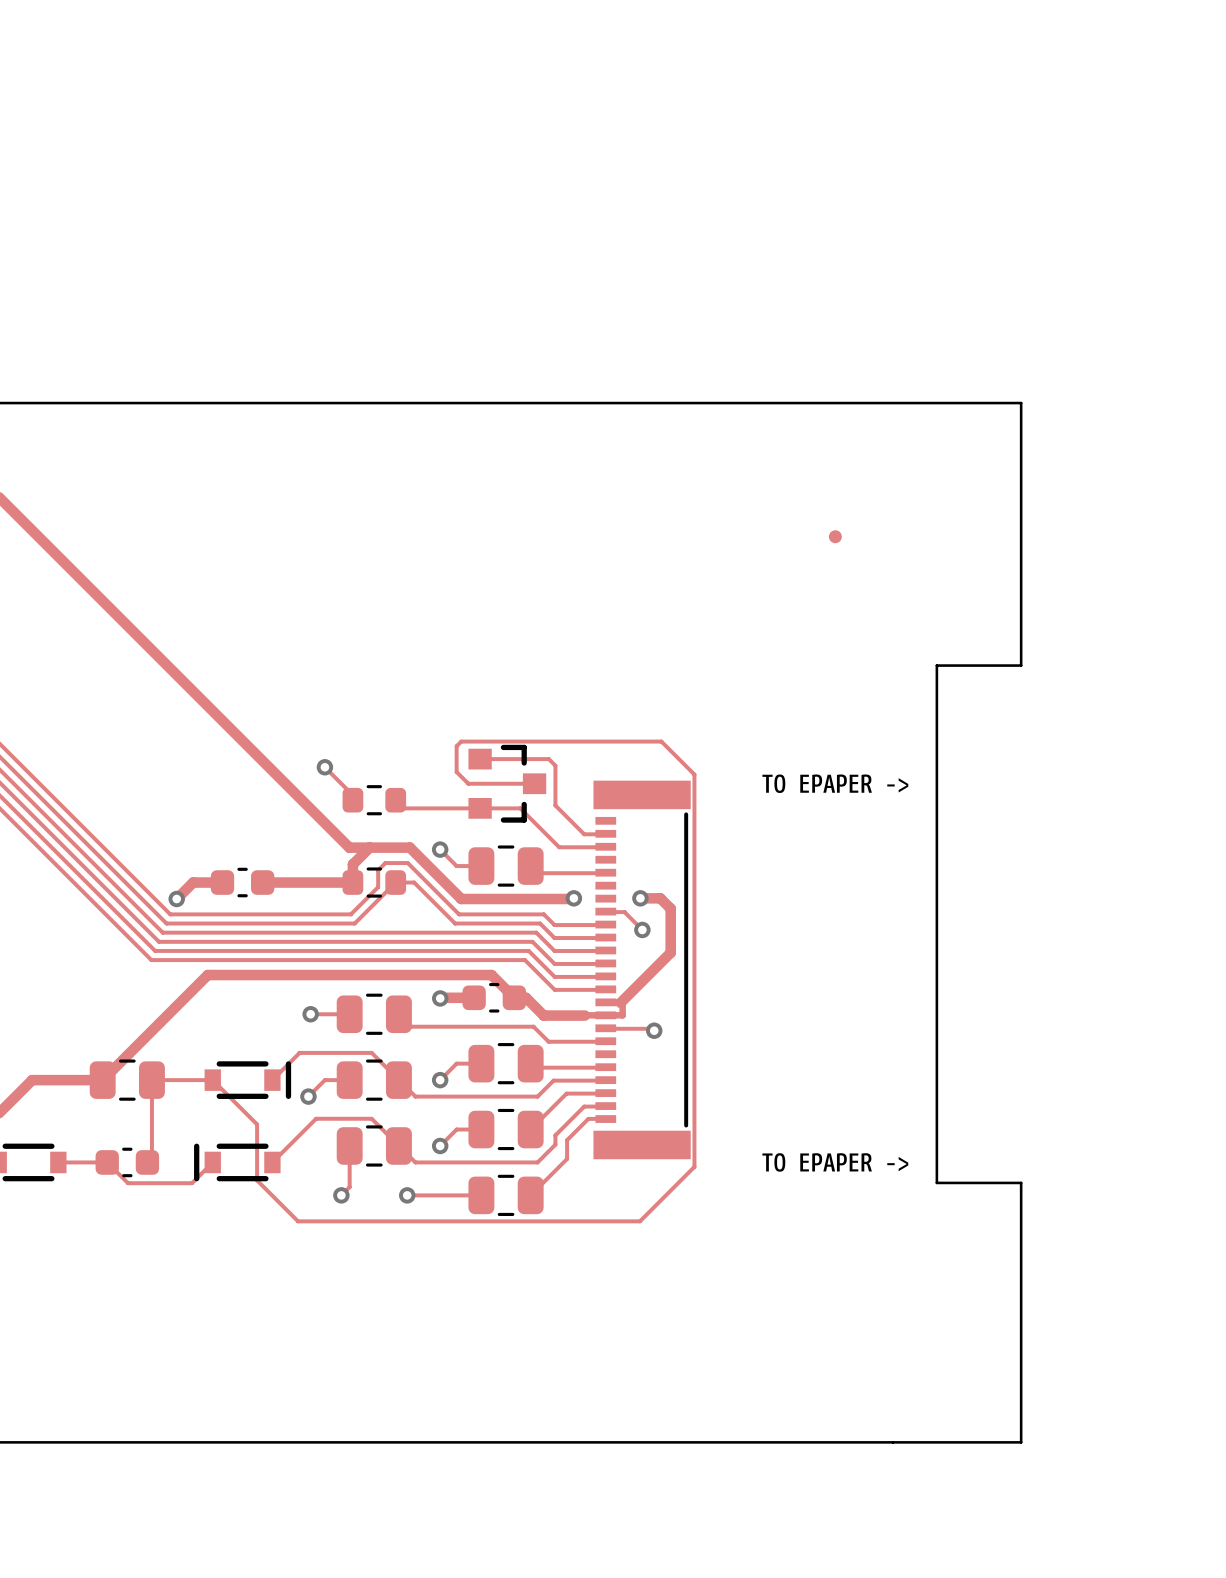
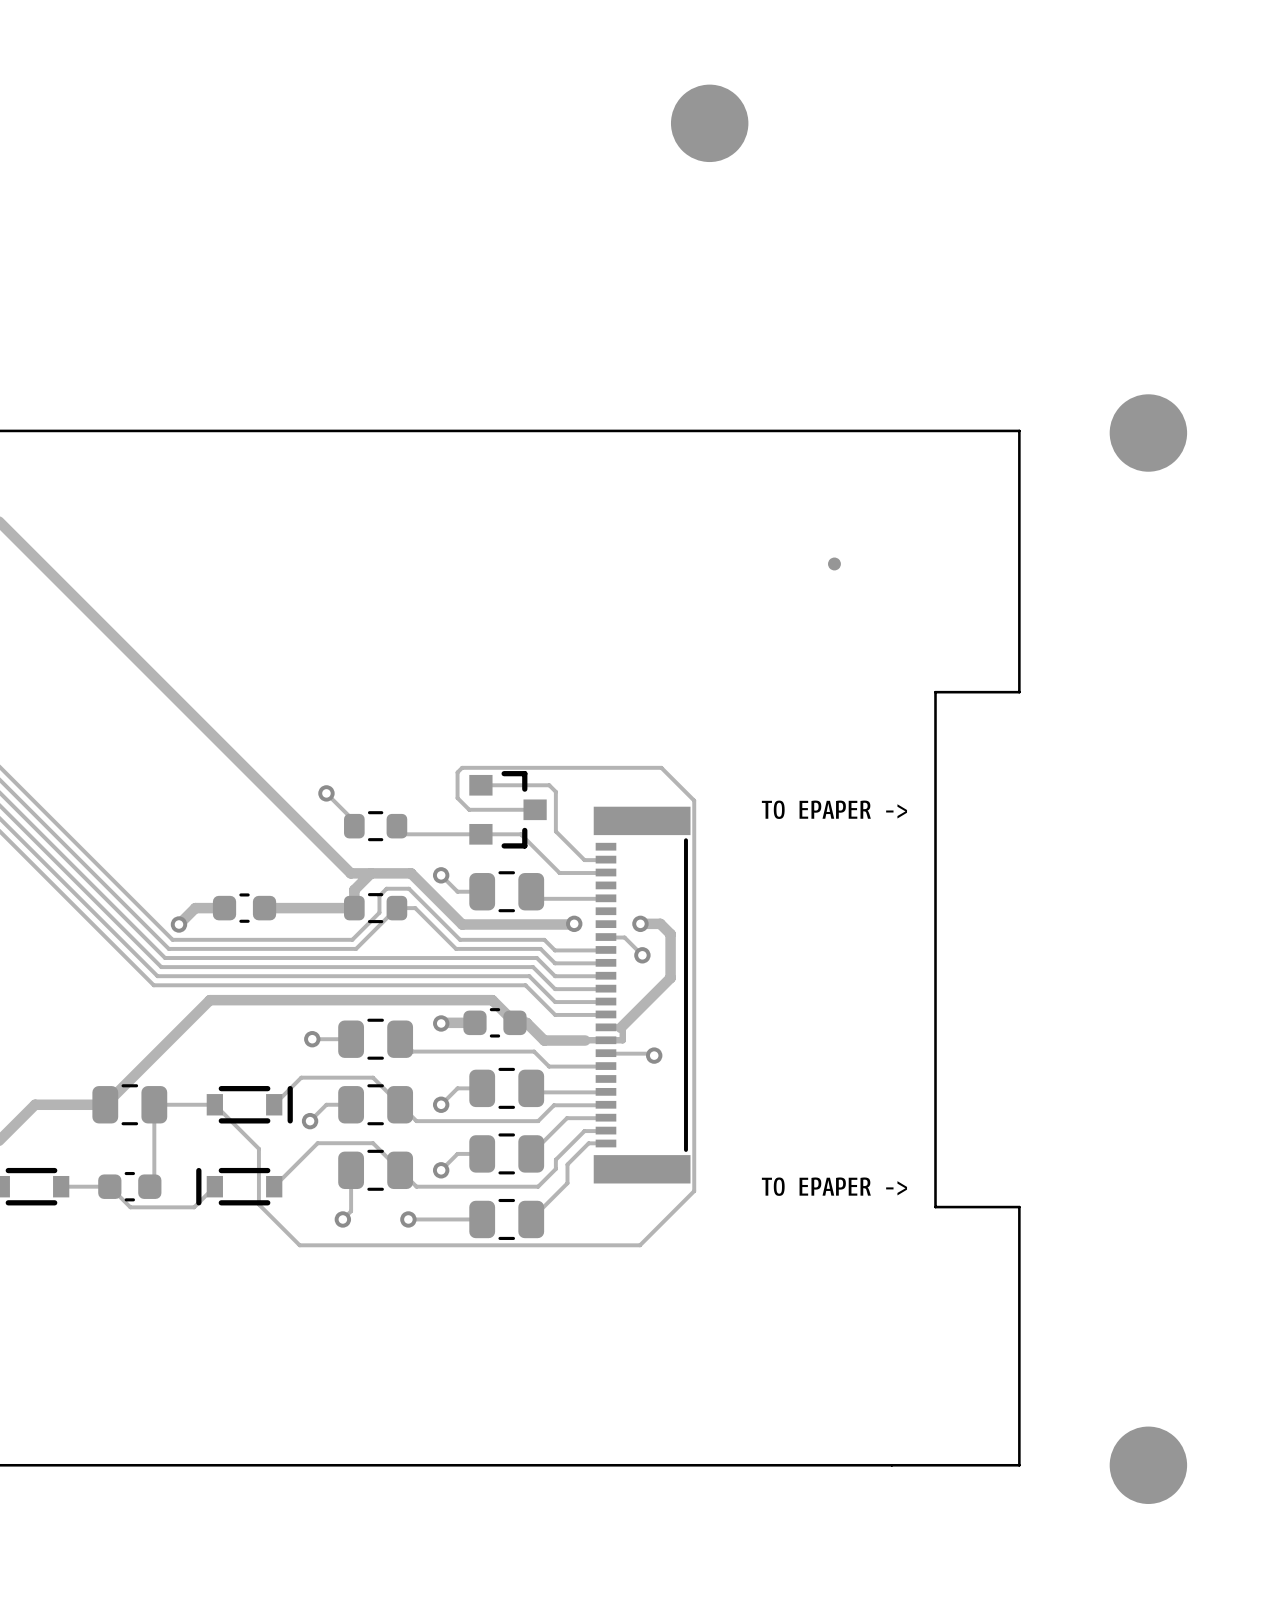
part: none -> (709, 123)
part: none -> (1148, 433)
part: none -> (1148, 1465)

